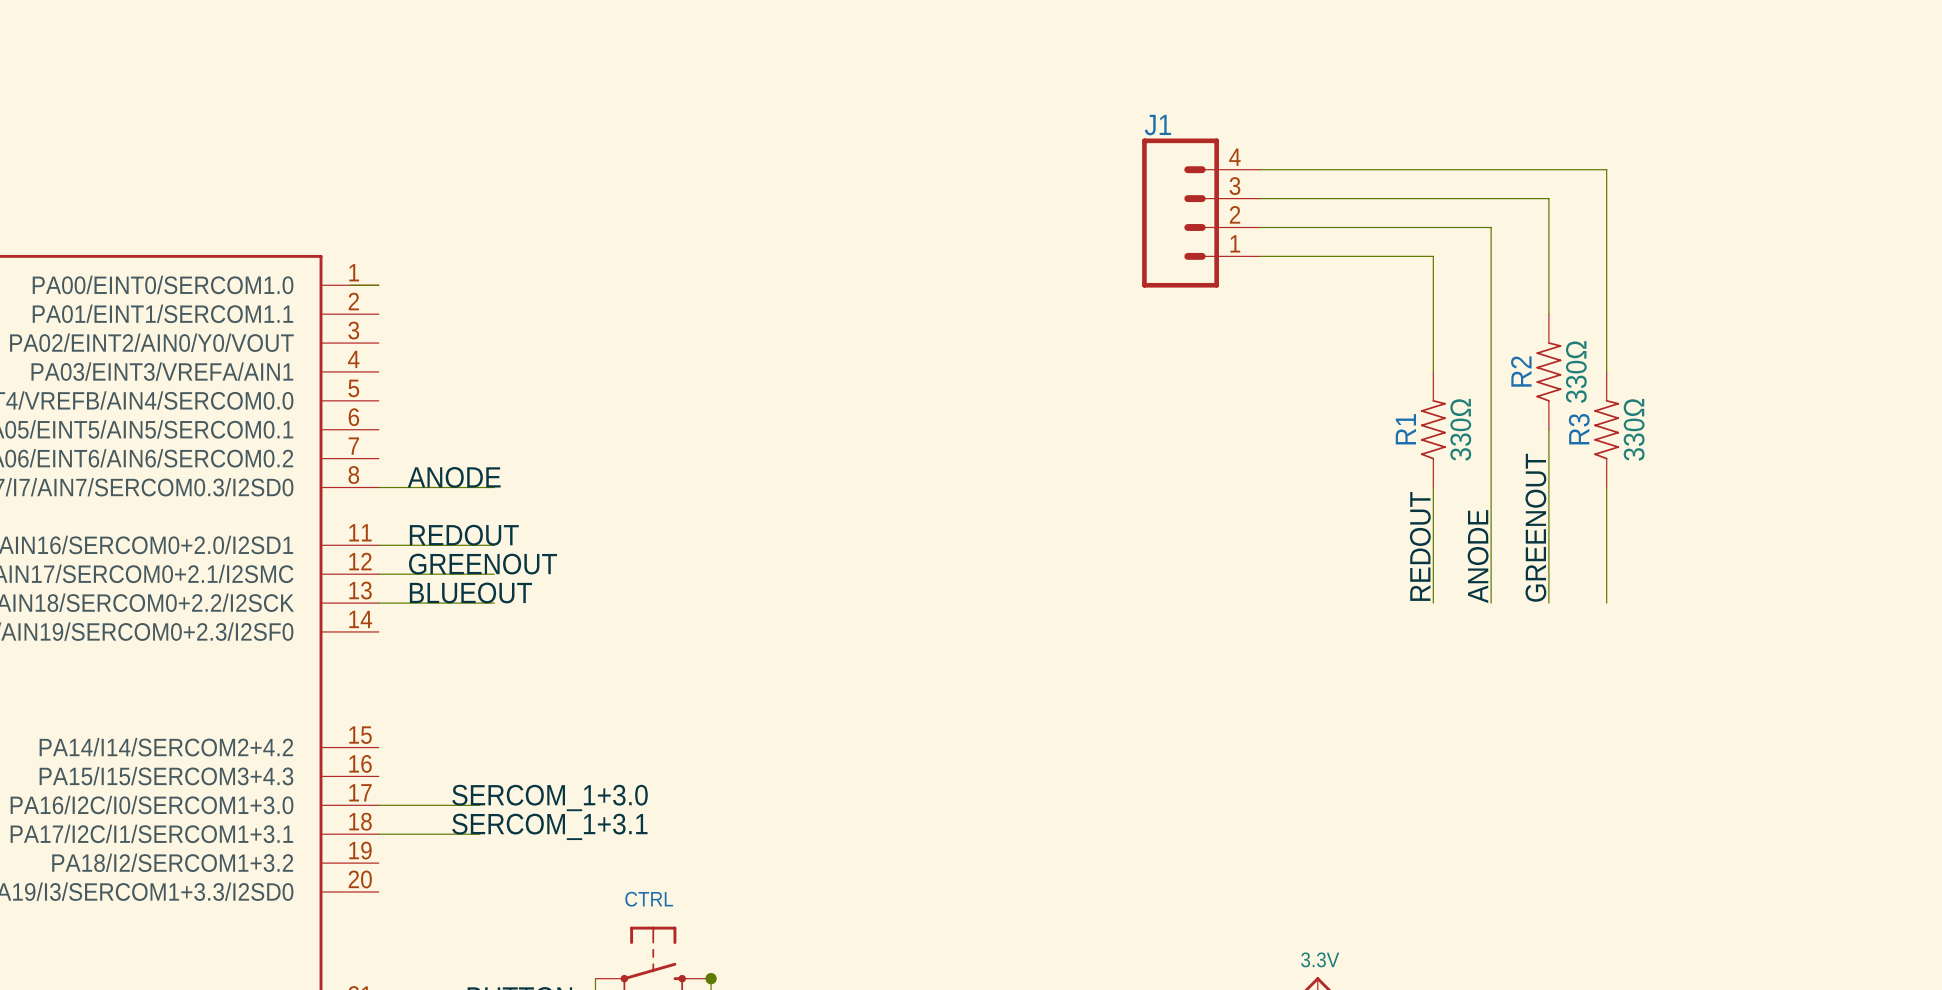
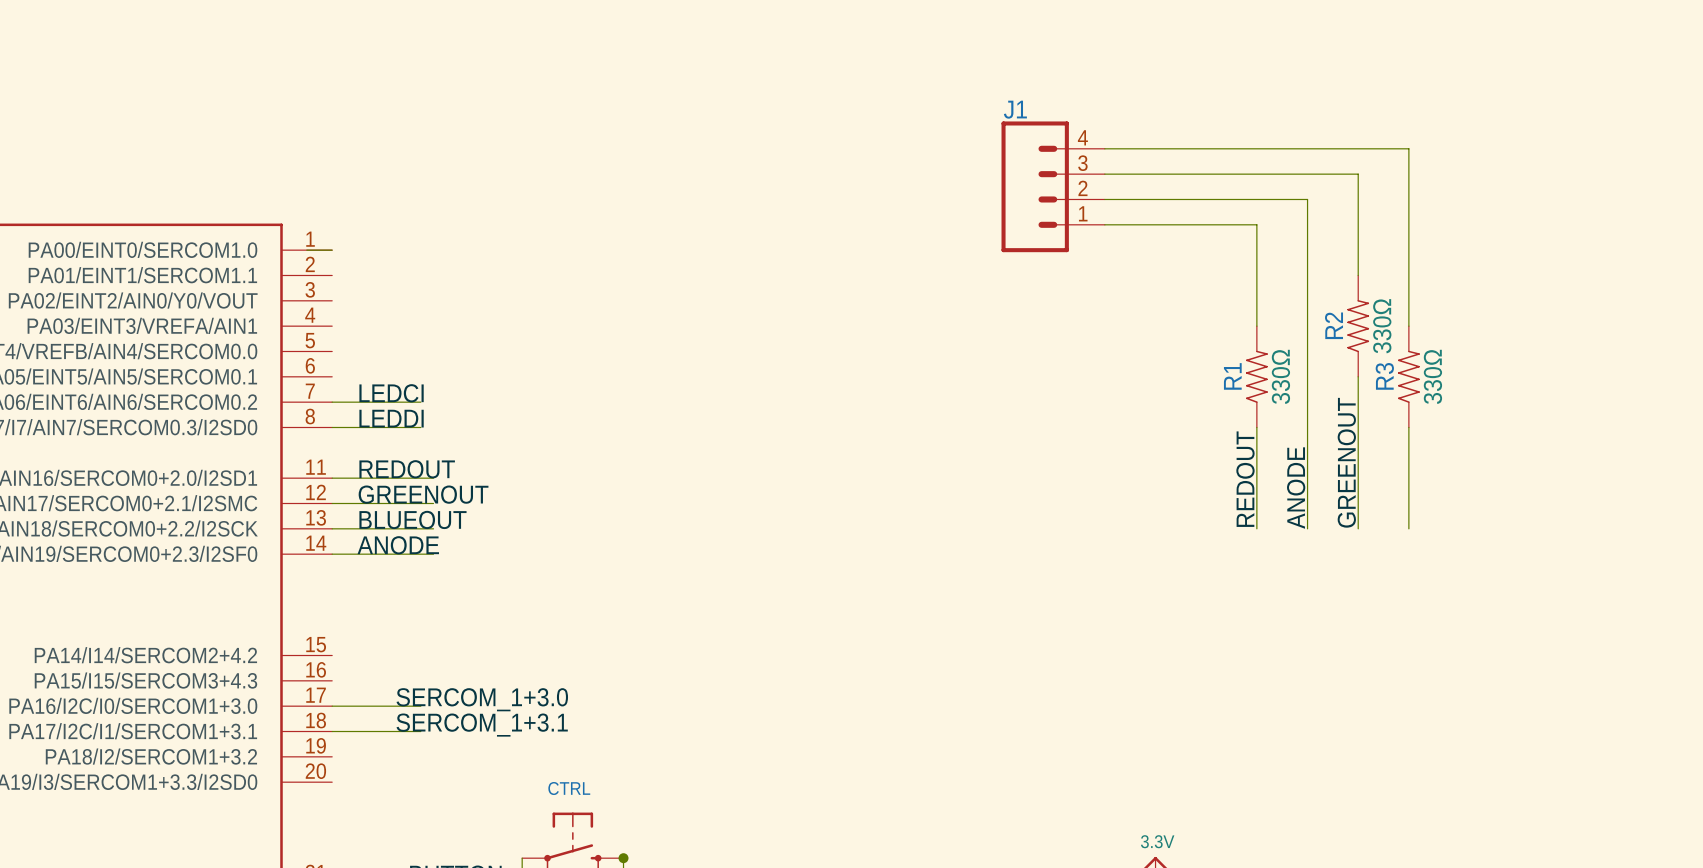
label: none -> LEDCI (391, 393)
wire: none -> (332, 402) (420, 402)
label: ANODE (454, 477) -> LEDDI (391, 418)
wire: (479, 487) (494, 487) -> none
label: none -> ANODE (398, 545)
wire: none -> (332, 554) (433, 554)

